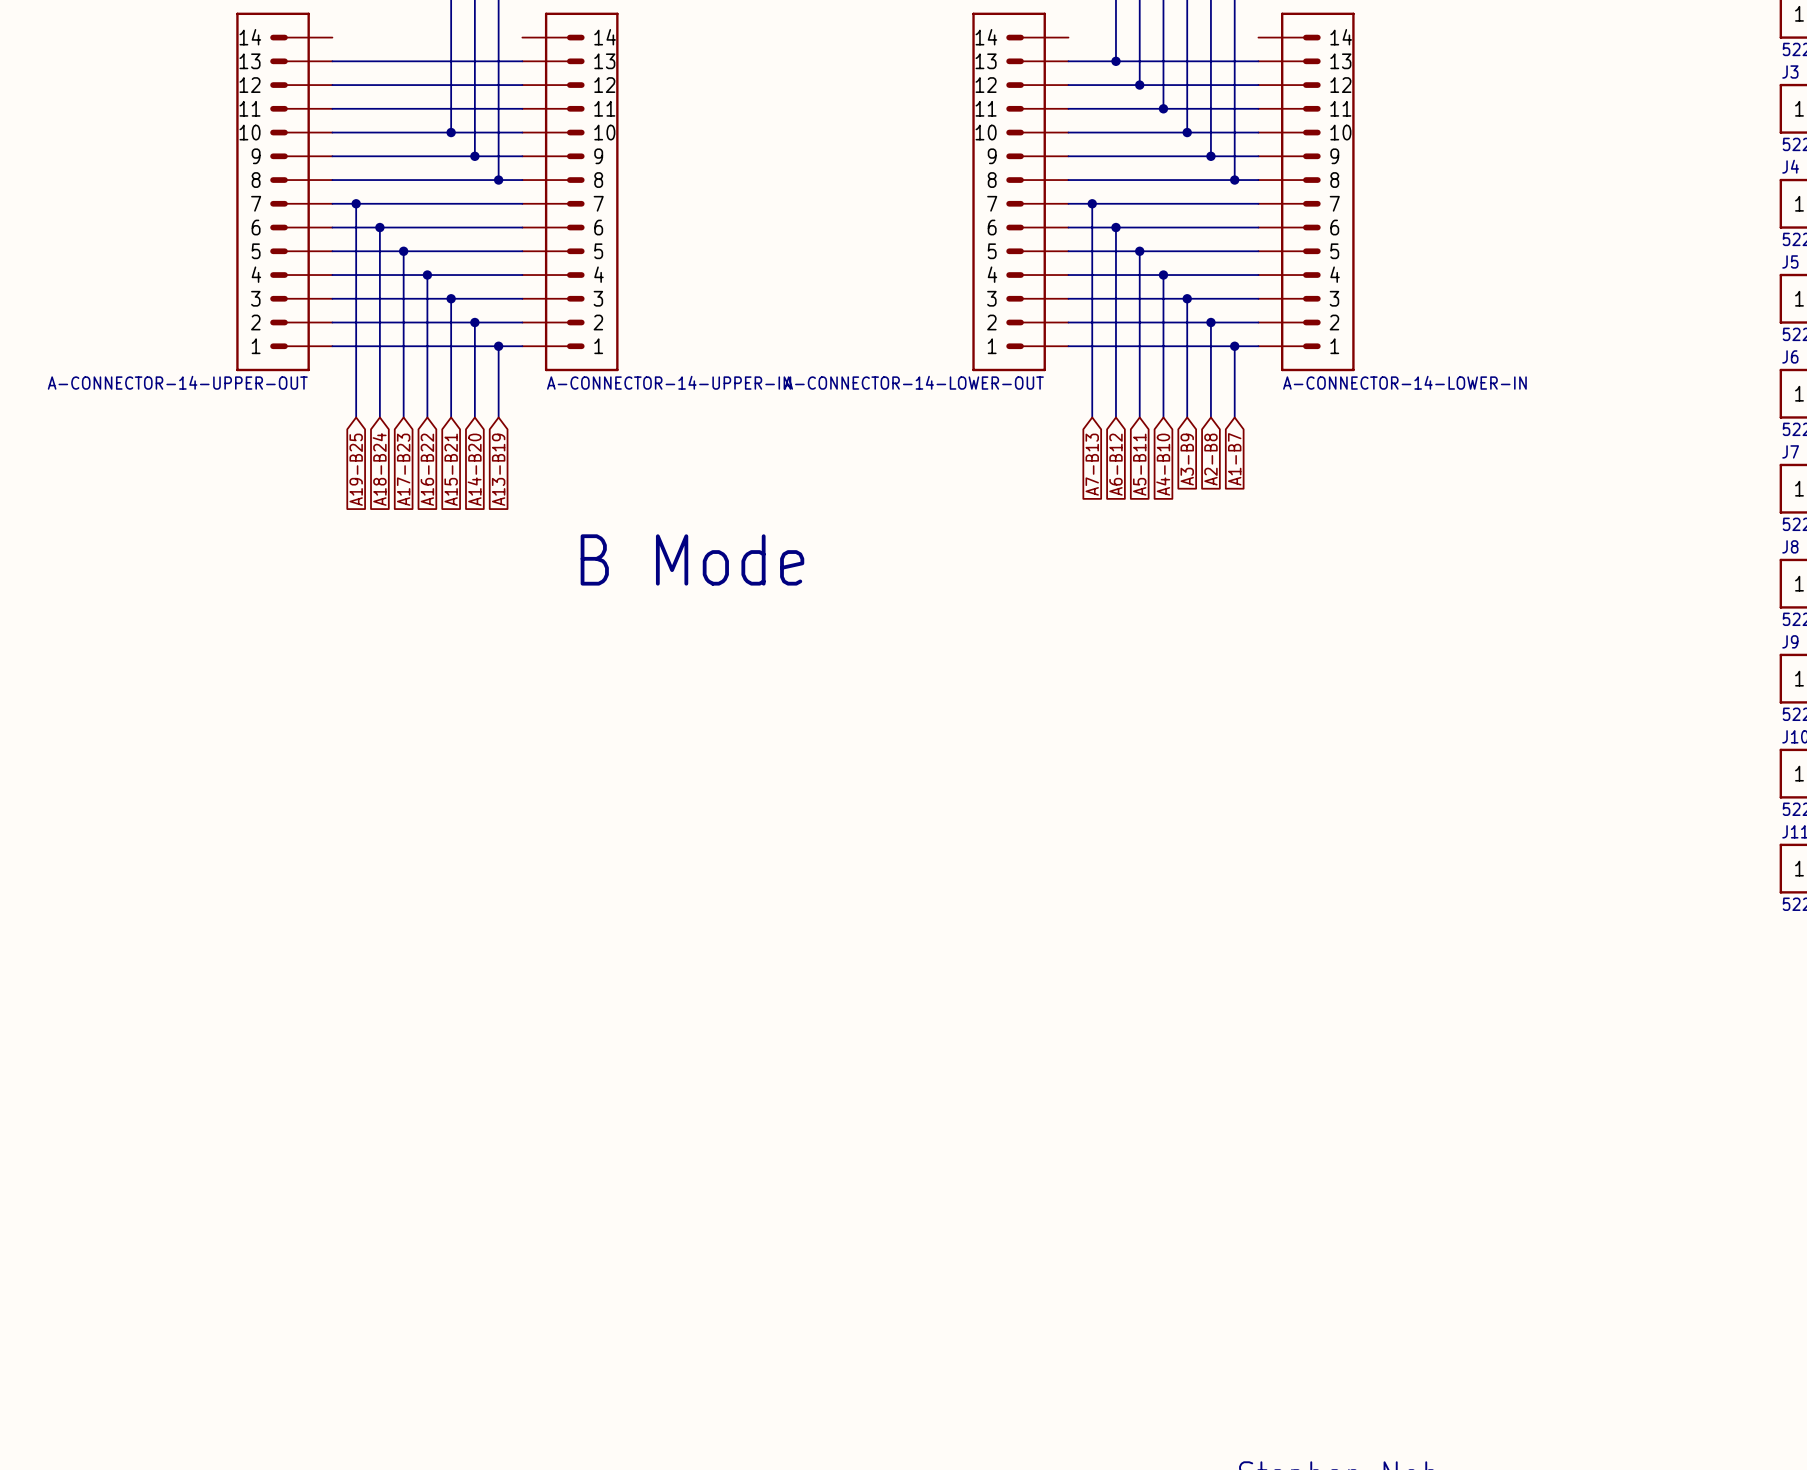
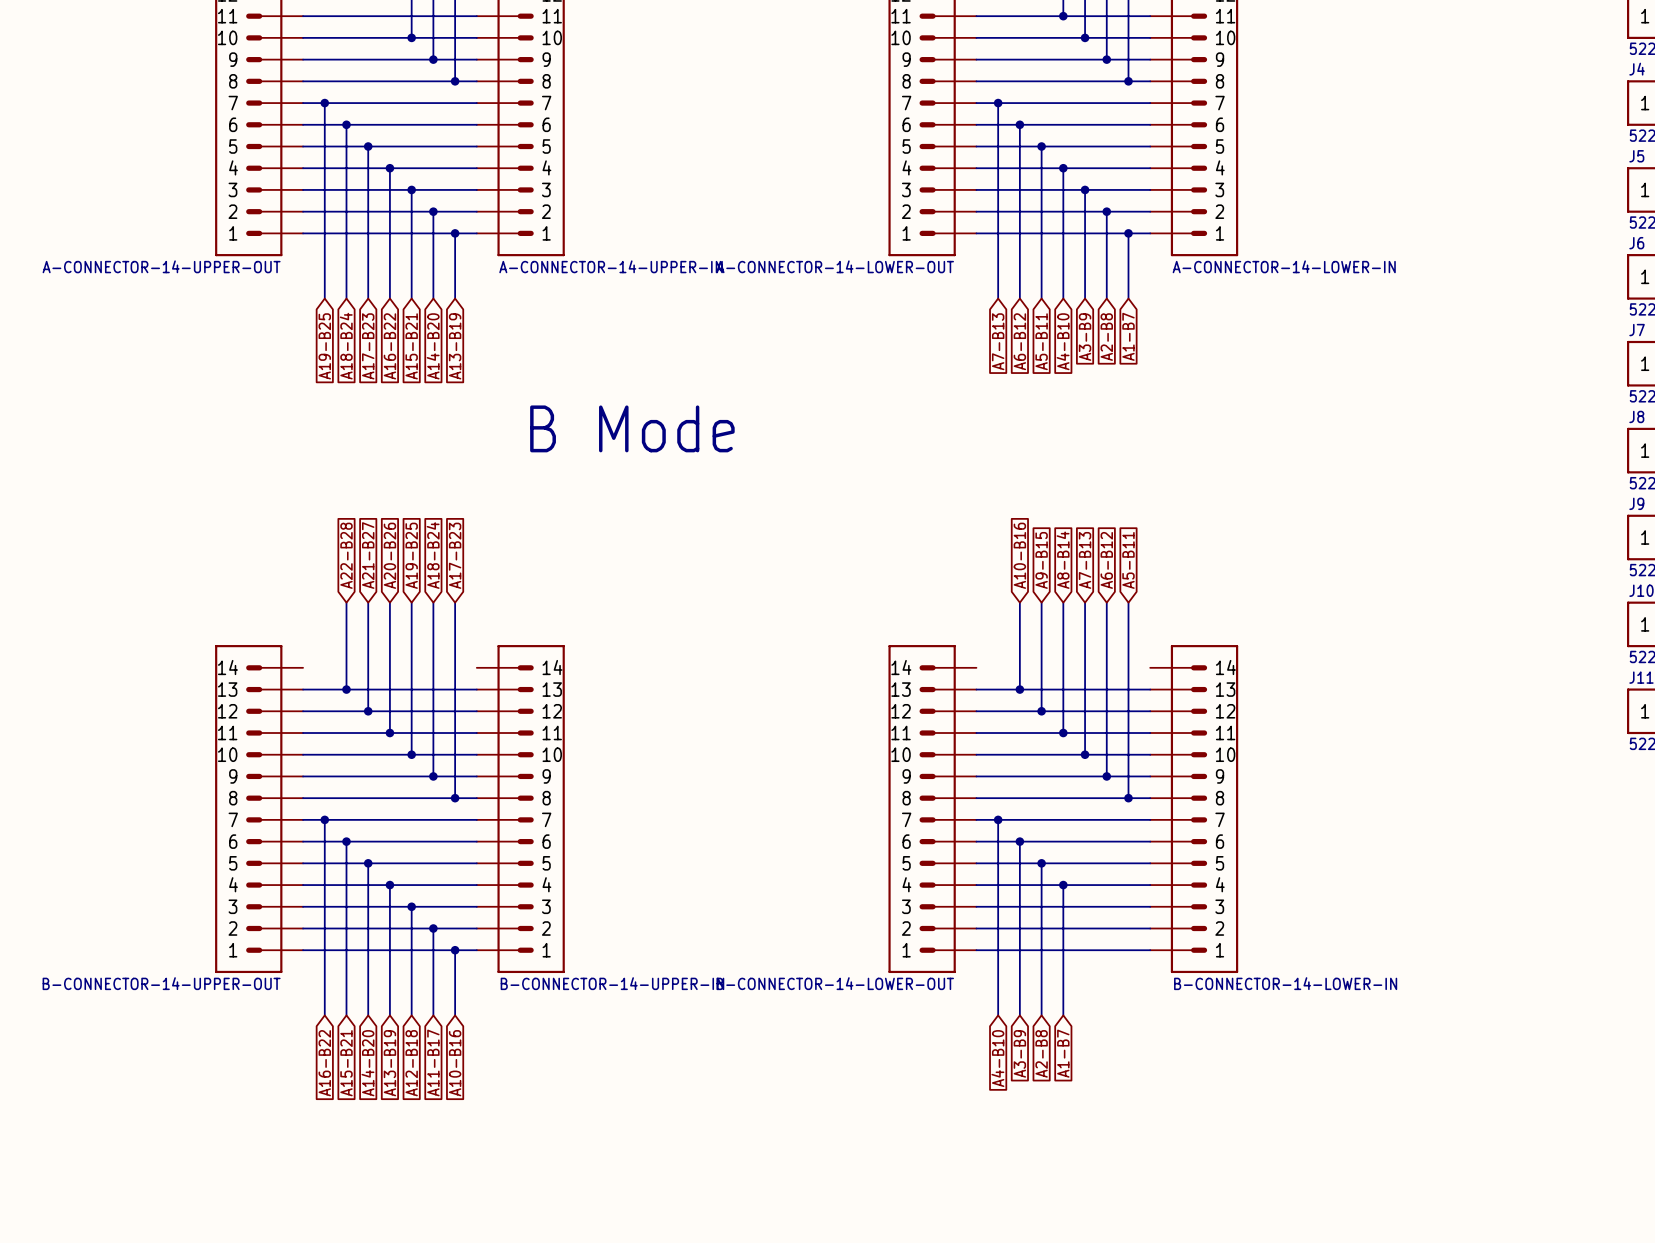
global label: none -> A22-B28 (346, 555)
global label: none -> A21-B27 (368, 555)
global label: none -> A20-B26 (389, 555)
global label: none -> A19-B25 (411, 555)
global label: none -> A18-B24 (433, 555)
global label: none -> A17-B23 (455, 555)
global label: none -> A10-B16 (1019, 555)
global label: none -> A9-B15 (1041, 560)
global label: none -> A8-B14 (1063, 560)
global label: none -> A7-B13 (1085, 560)
global label: none -> A6-B12 (1106, 560)
global label: none -> A5-B11 (1128, 560)
wire: none -> (346, 602) (346, 689)
wire: none -> (368, 602) (368, 711)
wire: none -> (389, 602) (389, 733)
wire: none -> (411, 602) (411, 754)
wire: none -> (433, 602) (433, 776)
wire: none -> (455, 602) (455, 798)
wire: none -> (1019, 602) (1019, 689)
wire: none -> (1041, 602) (1041, 711)
wire: none -> (1063, 602) (1063, 733)
wire: none -> (1085, 602) (1085, 754)
wire: none -> (1106, 602) (1106, 776)
wire: none -> (1128, 602) (1128, 798)
wire: none -> (303, 689) (476, 689)
junction: none -> (346, 689)
wire: none -> (976, 689) (1150, 689)
junction: none -> (1019, 689)
wire: none -> (303, 711) (476, 711)
junction: none -> (368, 711)
wire: none -> (976, 711) (1150, 711)
junction: none -> (1041, 711)
wire: none -> (303, 733) (476, 733)
junction: none -> (389, 733)
wire: none -> (976, 733) (1150, 733)
junction: none -> (1063, 733)
wire: none -> (303, 754) (476, 754)
junction: none -> (411, 754)
wire: none -> (976, 754) (1150, 754)
junction: none -> (1085, 754)
wire: none -> (303, 776) (476, 776)
junction: none -> (433, 776)
wire: none -> (976, 776) (1150, 776)
junction: none -> (1106, 776)
wire: none -> (303, 798) (476, 798)
junction: none -> (455, 798)
wire: none -> (976, 798) (1150, 798)
junction: none -> (1128, 798)
B-CONNECTOR-14-UPPER-OUT: none -> (259, 809)
B-CONNECTOR-14-UPPER-IN: none -> (520, 809)
B-CONNECTOR-14-LOWER-OUT: none -> (932, 809)
B-CONNECTOR-14-LOWER-IN: none -> (1194, 809)
wire: none -> (303, 819) (476, 819)
wire: none -> (324, 819) (324, 1015)
junction: none -> (324, 819)
wire: none -> (976, 819) (1150, 819)
wire: none -> (998, 819) (998, 1015)
junction: none -> (998, 819)
wire: none -> (303, 841) (476, 841)
wire: none -> (346, 841) (346, 1015)
junction: none -> (346, 841)
wire: none -> (976, 841) (1150, 841)
wire: none -> (1019, 841) (1019, 1015)
junction: none -> (1019, 841)
wire: none -> (303, 863) (476, 863)
wire: none -> (368, 863) (368, 1015)
junction: none -> (368, 863)
wire: none -> (976, 863) (1150, 863)
wire: none -> (1041, 863) (1041, 1015)
junction: none -> (1041, 863)
wire: none -> (303, 885) (476, 885)
wire: none -> (389, 885) (389, 1015)
junction: none -> (389, 885)
wire: none -> (976, 885) (1150, 885)
wire: none -> (1063, 885) (1063, 1015)
junction: none -> (1063, 885)
wire: none -> (303, 906) (476, 906)
wire: none -> (411, 906) (411, 1015)
junction: none -> (411, 906)
wire: none -> (976, 906) (1150, 906)
wire: none -> (303, 928) (476, 928)
wire: none -> (433, 928) (433, 1015)
junction: none -> (433, 928)
wire: none -> (976, 928) (1150, 928)
wire: none -> (303, 950) (476, 950)
wire: none -> (455, 950) (455, 1015)
junction: none -> (455, 950)
wire: none -> (976, 950) (1150, 950)
global label: none -> A1-B7 (1063, 1053)
global label: none -> A3-B9 (1019, 1053)
global label: none -> A2-B8 (1041, 1053)
global label: none -> A4-B10 (997, 1058)
global label: none -> A16-B22 (324, 1063)
global label: none -> A15-B21 (346, 1063)
global label: none -> A14-B20 (367, 1063)
global label: none -> A13-B19 (389, 1063)
global label: none -> A12-B18 (411, 1063)
global label: none -> A11-B17 (433, 1062)
global label: none -> A10-B16 (455, 1063)

